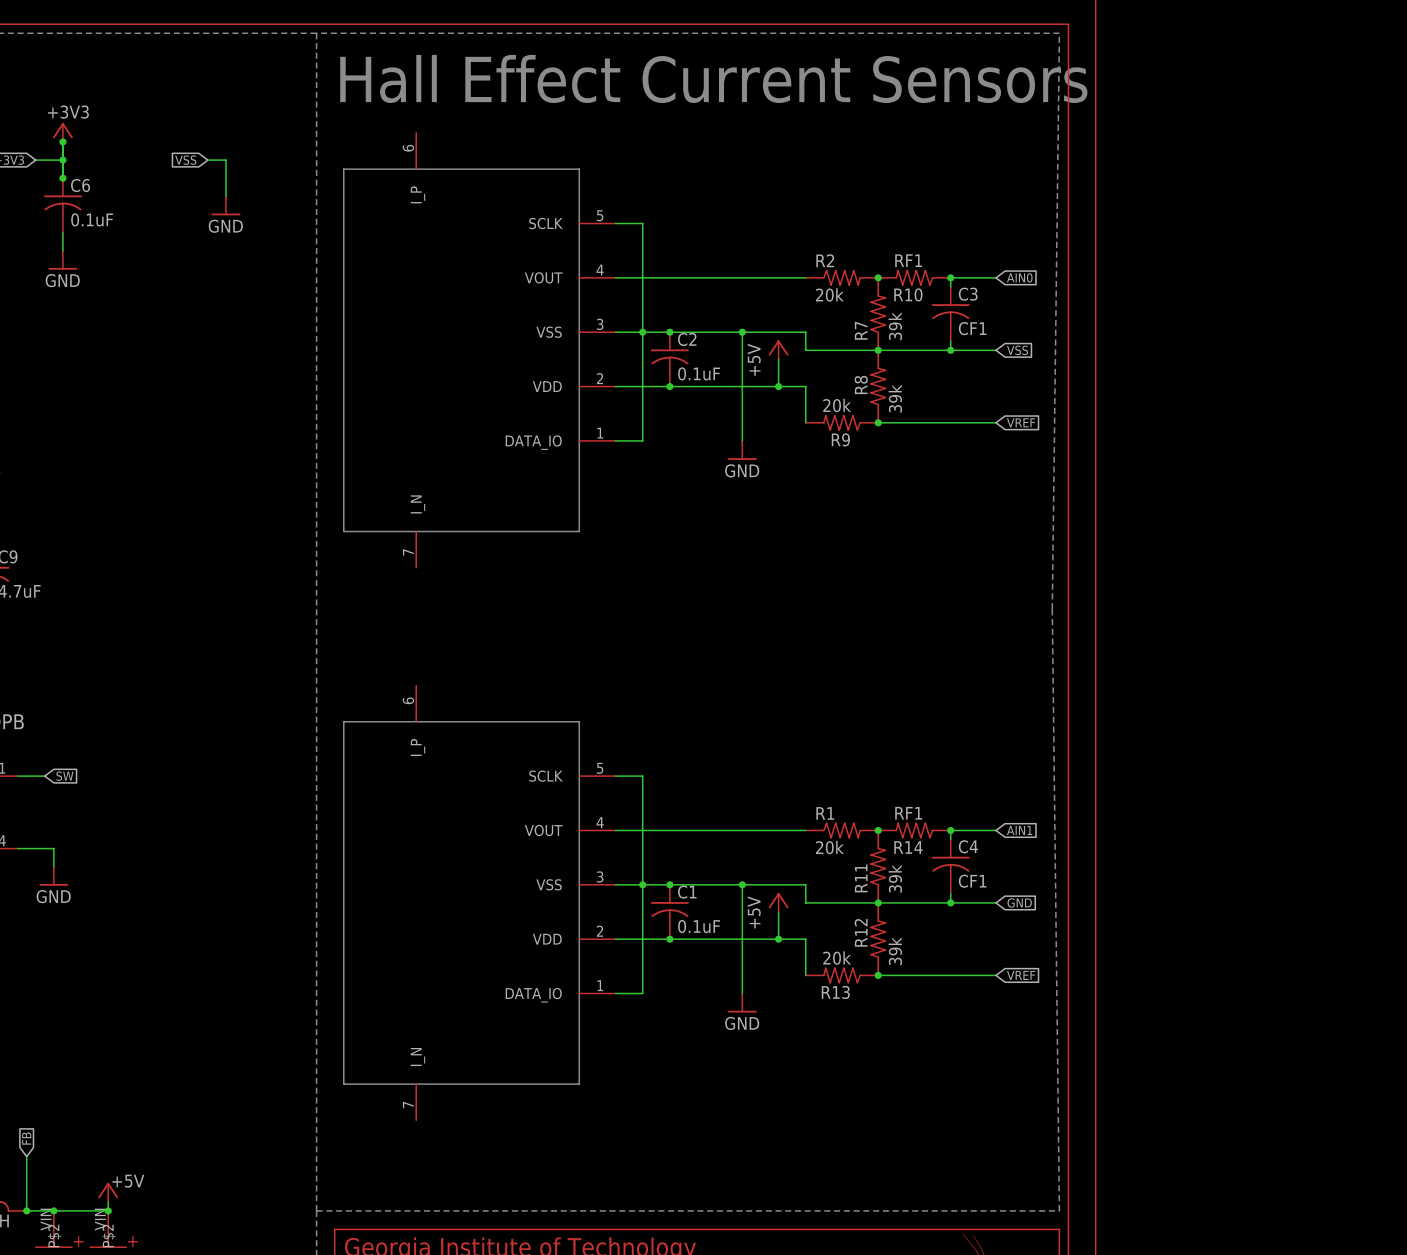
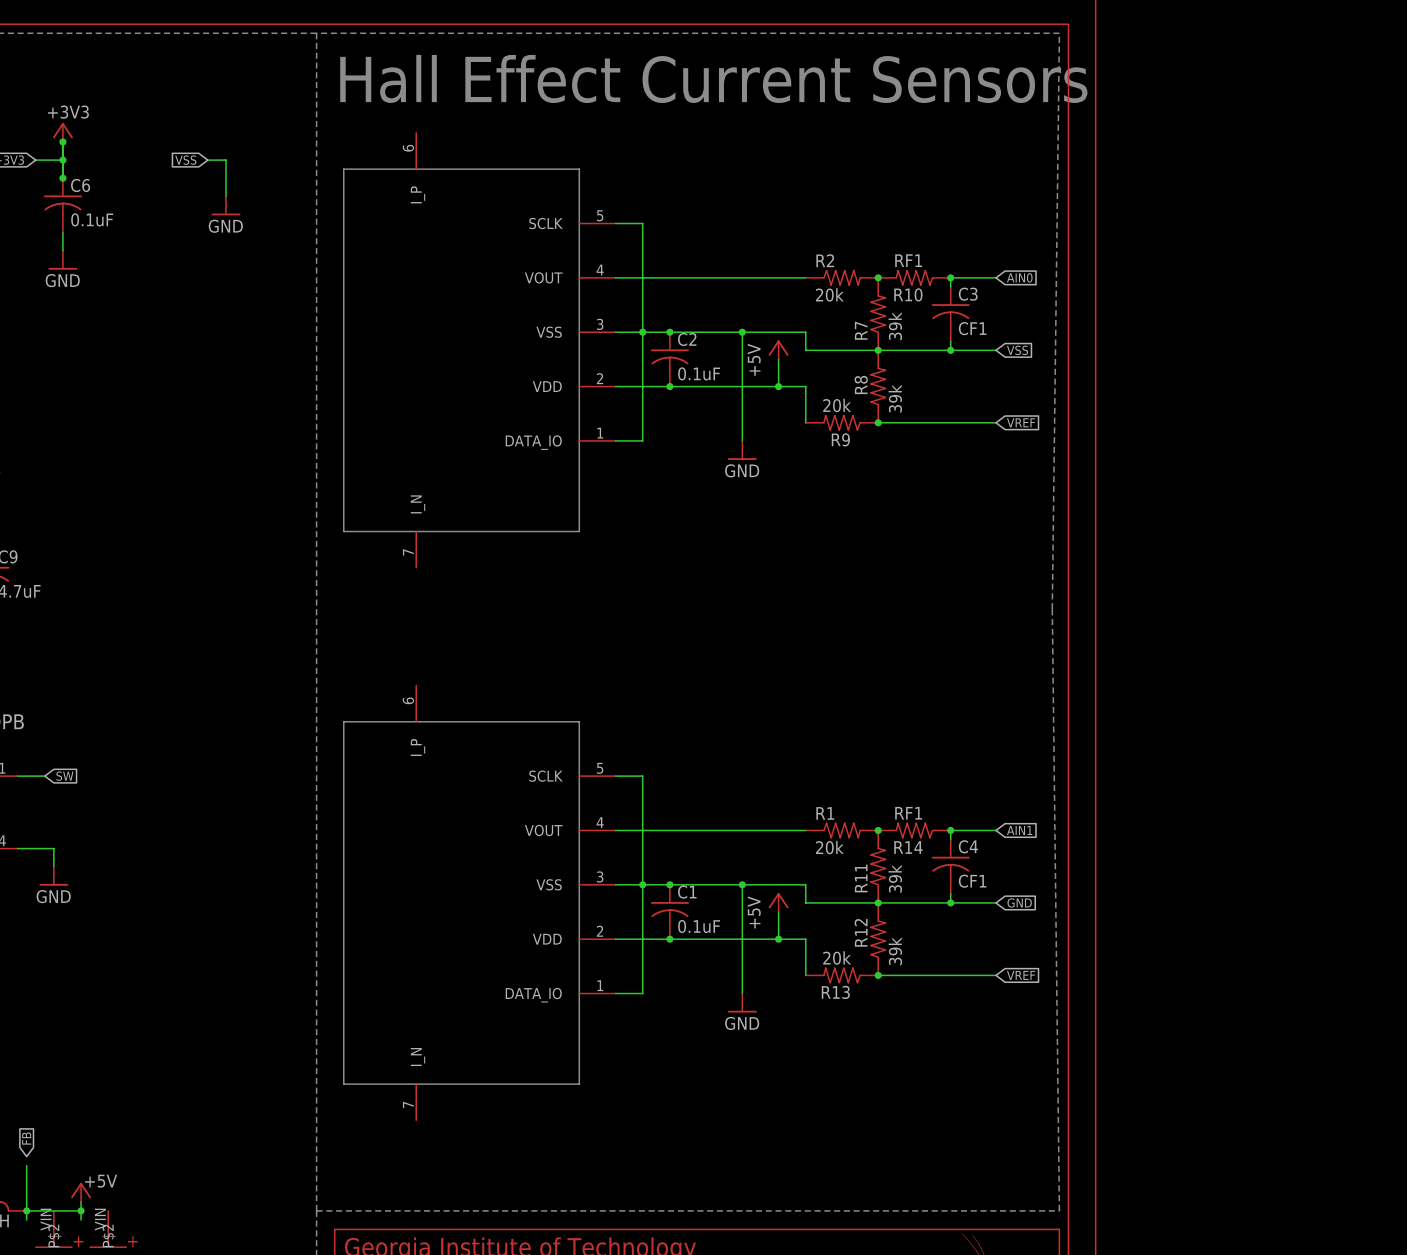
wire: (26, 1156) (26, 1165) -> (26, 1210) (26, 1220)
power symbol position: +5V (108, 1192) -> +5V (81, 1192)
wire: none -> (81, 1201) (81, 1220)
wire: (108, 1201) (108, 1210) (81, 1210) -> none
junction: (53, 1210) -> none
junction: none -> (81, 1210)
junction: (108, 1210) -> none

